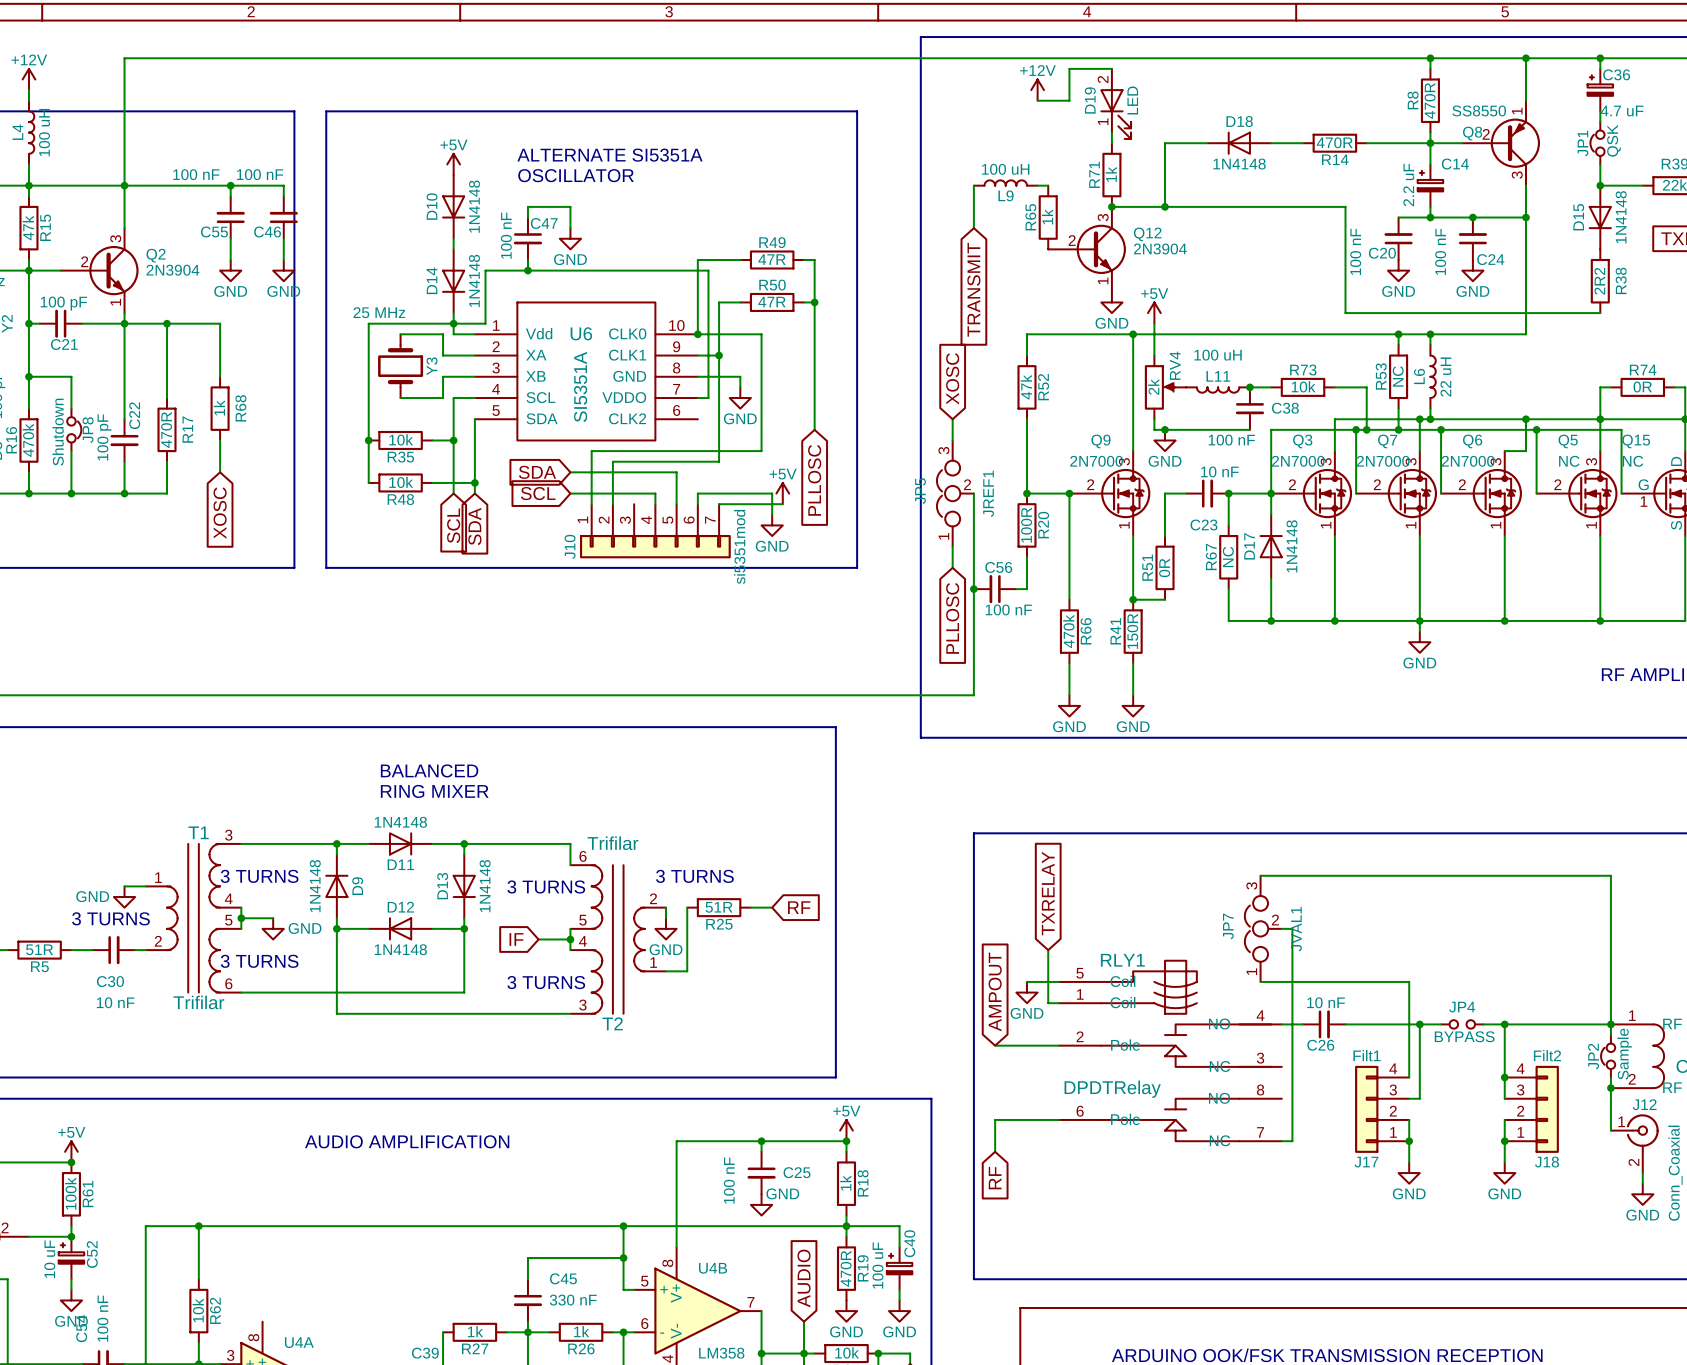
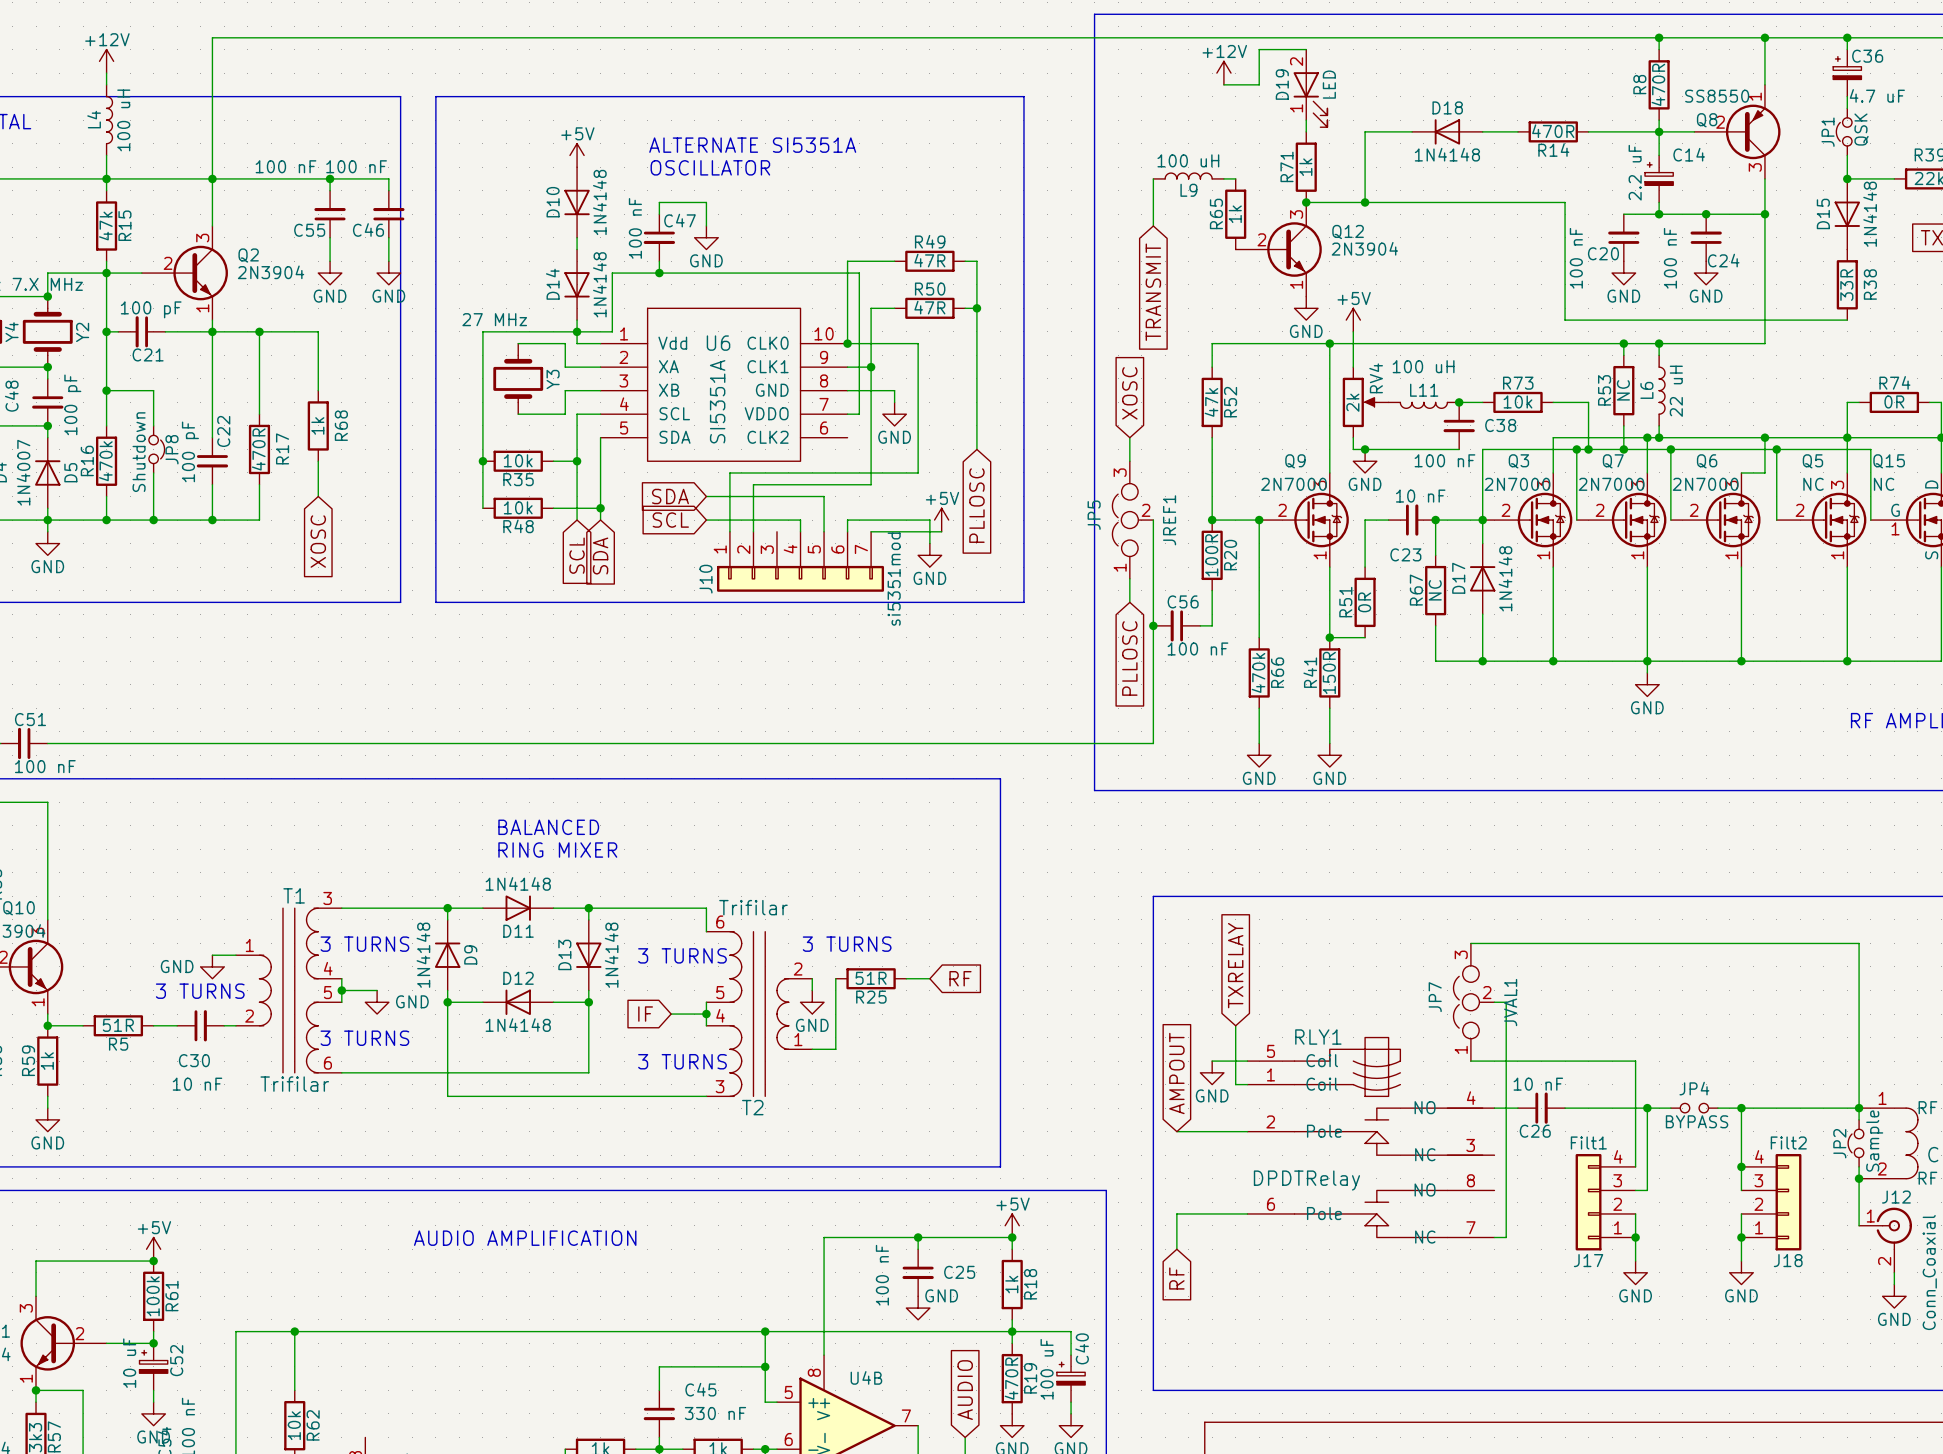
R38 value: 2R2 (1599, 281) -> 33R (1846, 285)
Y3 value: 25 MHz (379, 312) -> 27 MHz (494, 319)

